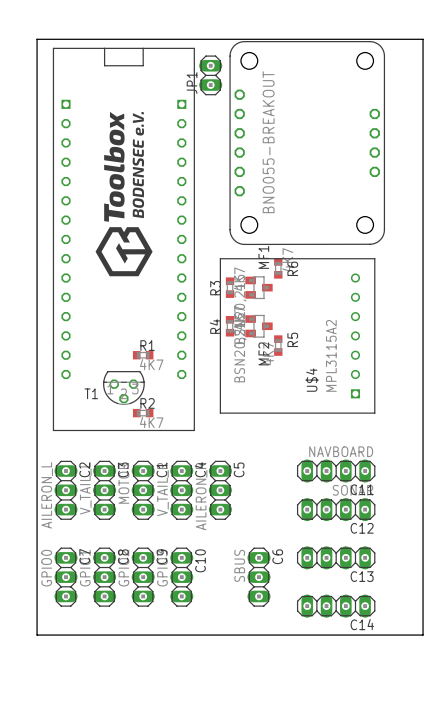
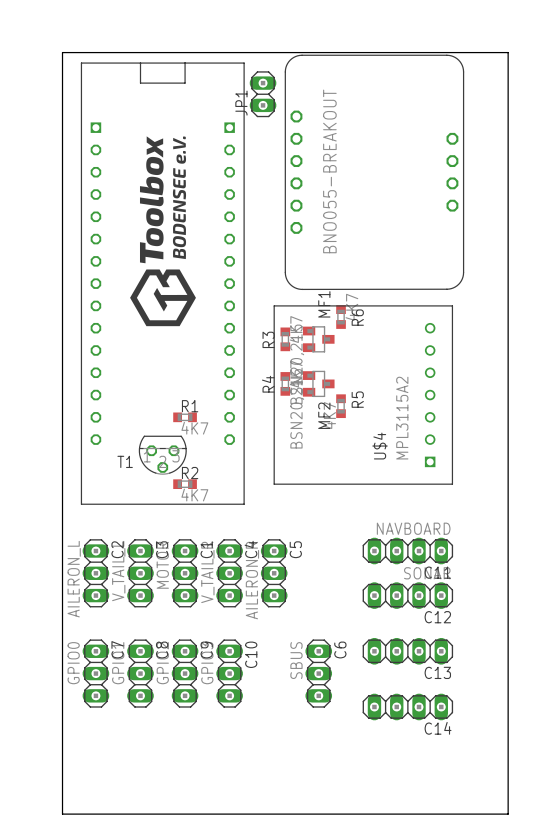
part footprint: [229, 41, 385, 245] -> [284, 54, 465, 290]
board edge: (37, 635) (423, 635) -> (62, 740) (62, 814) (508, 814) (508, 740)

